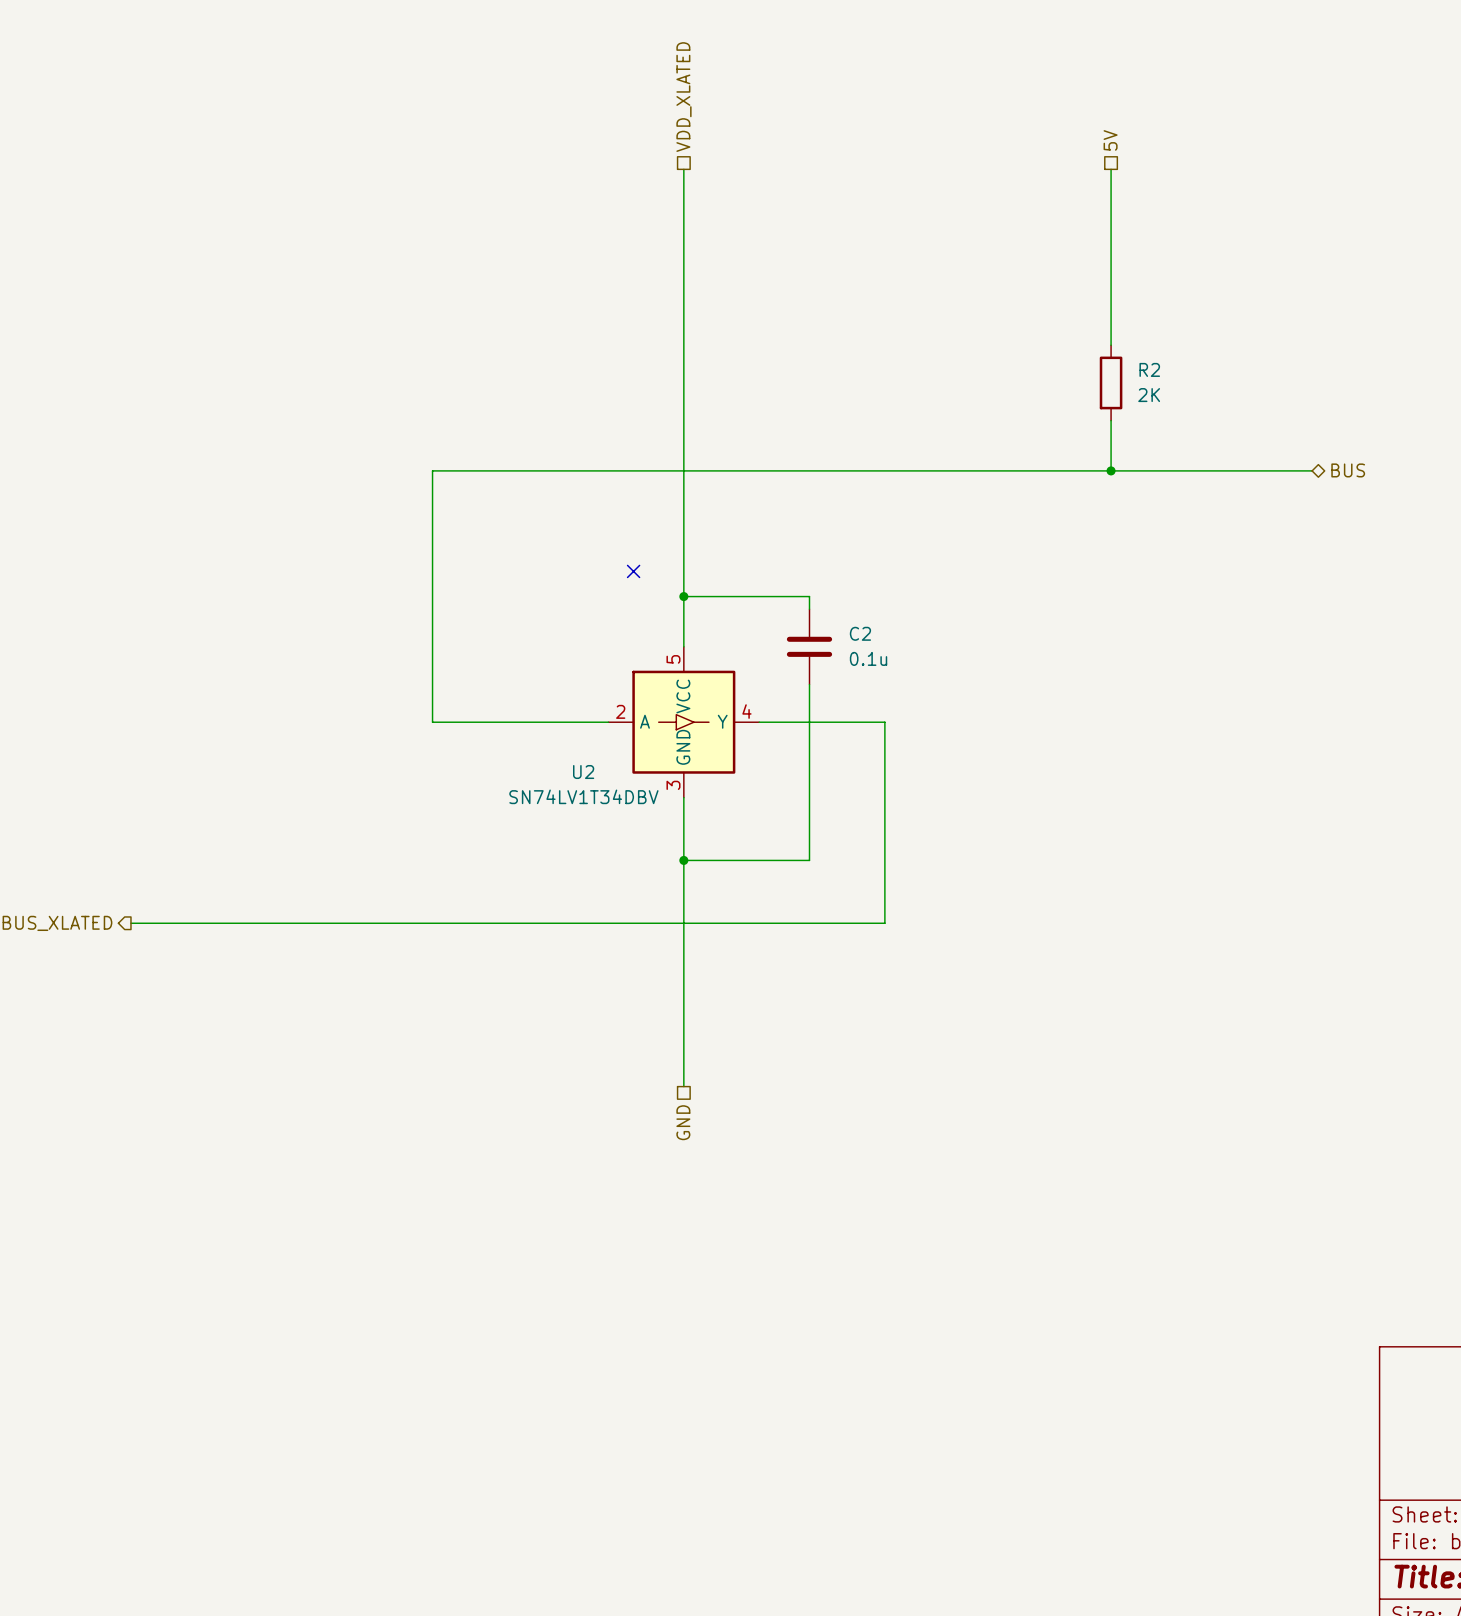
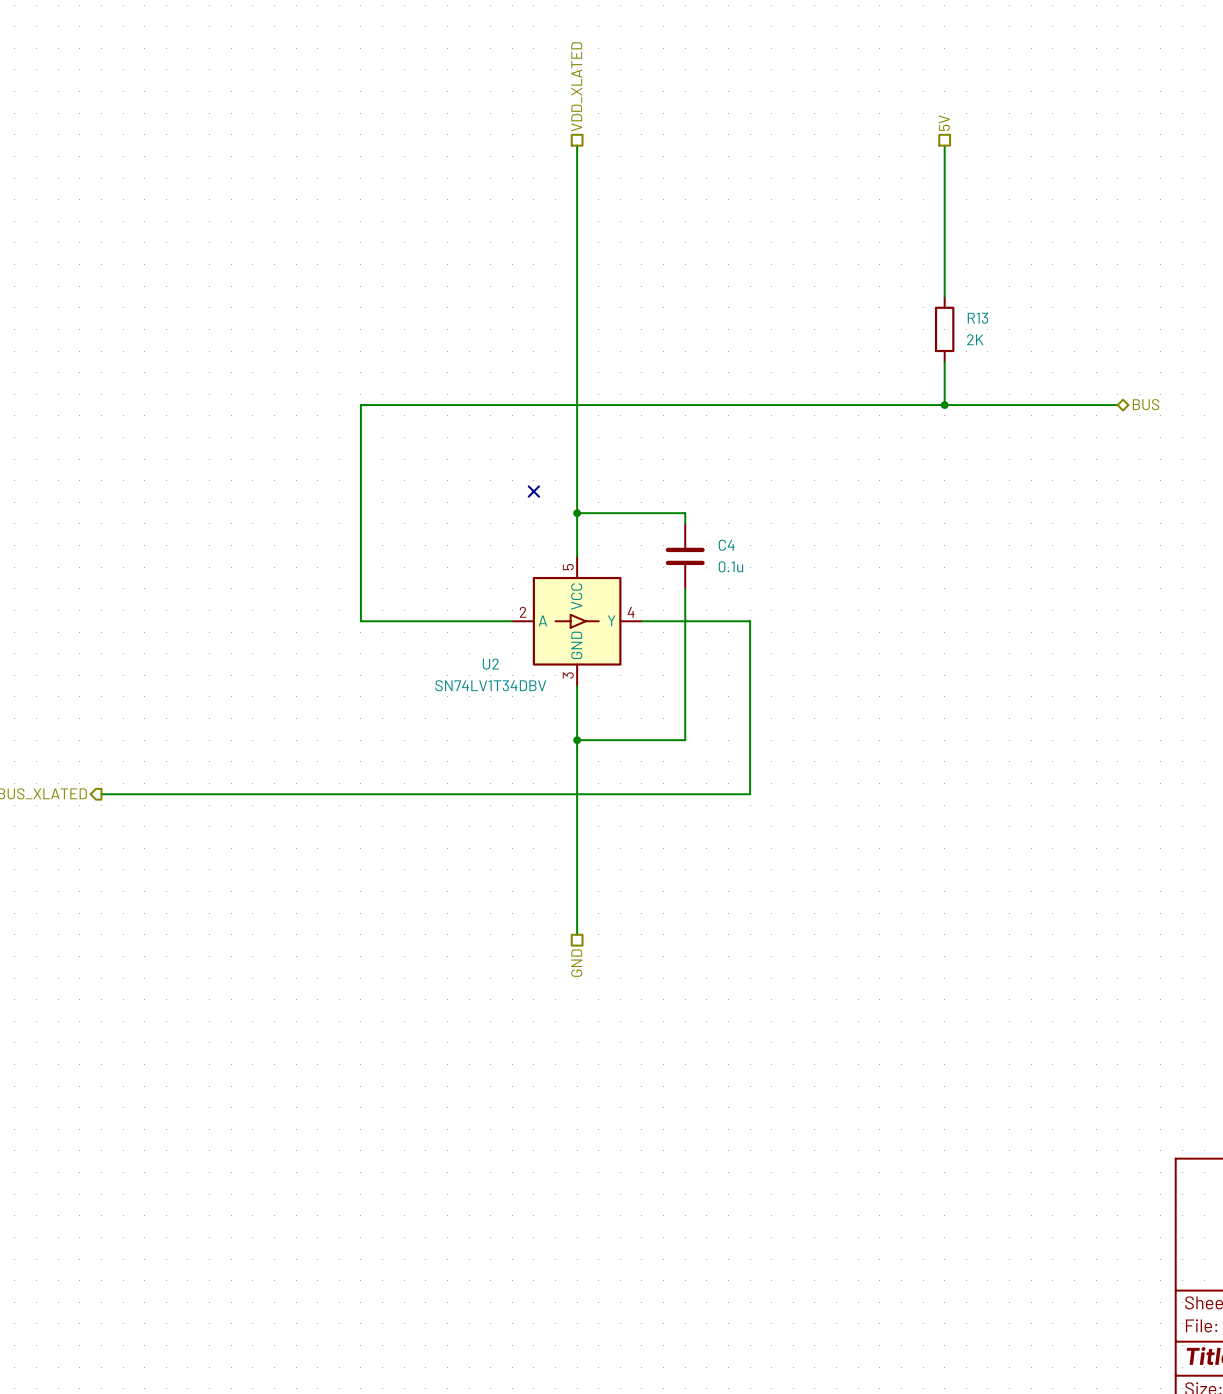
R2 name: R2 (1149, 369) -> R13 (977, 318)
C2 name: C2 (860, 633) -> C4 (726, 545)

